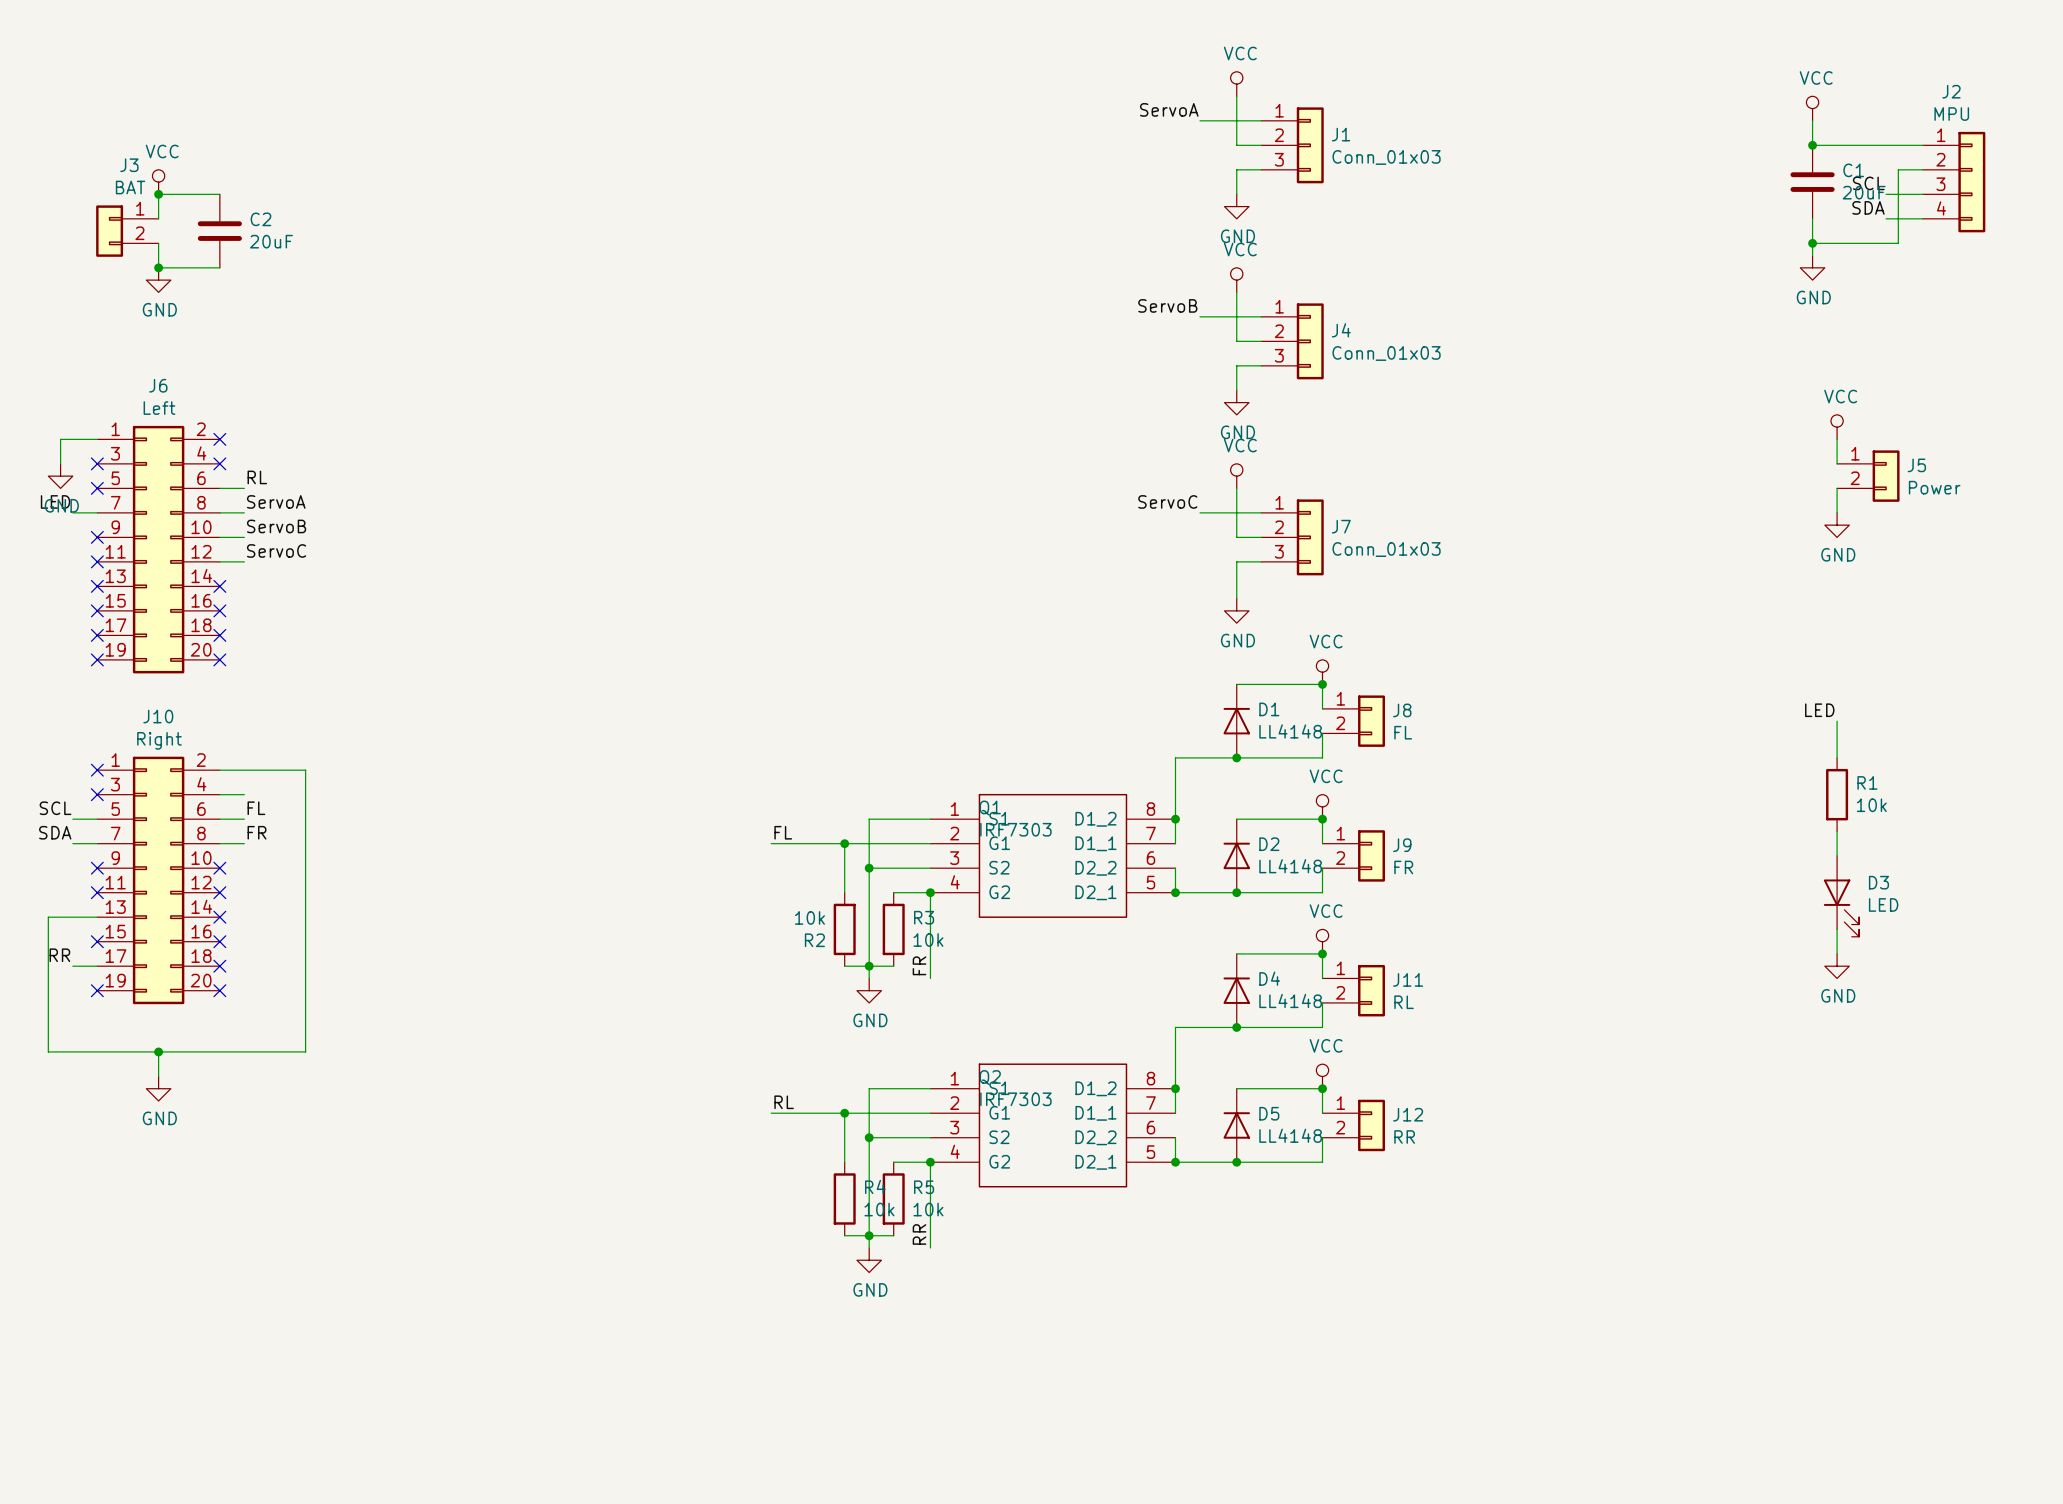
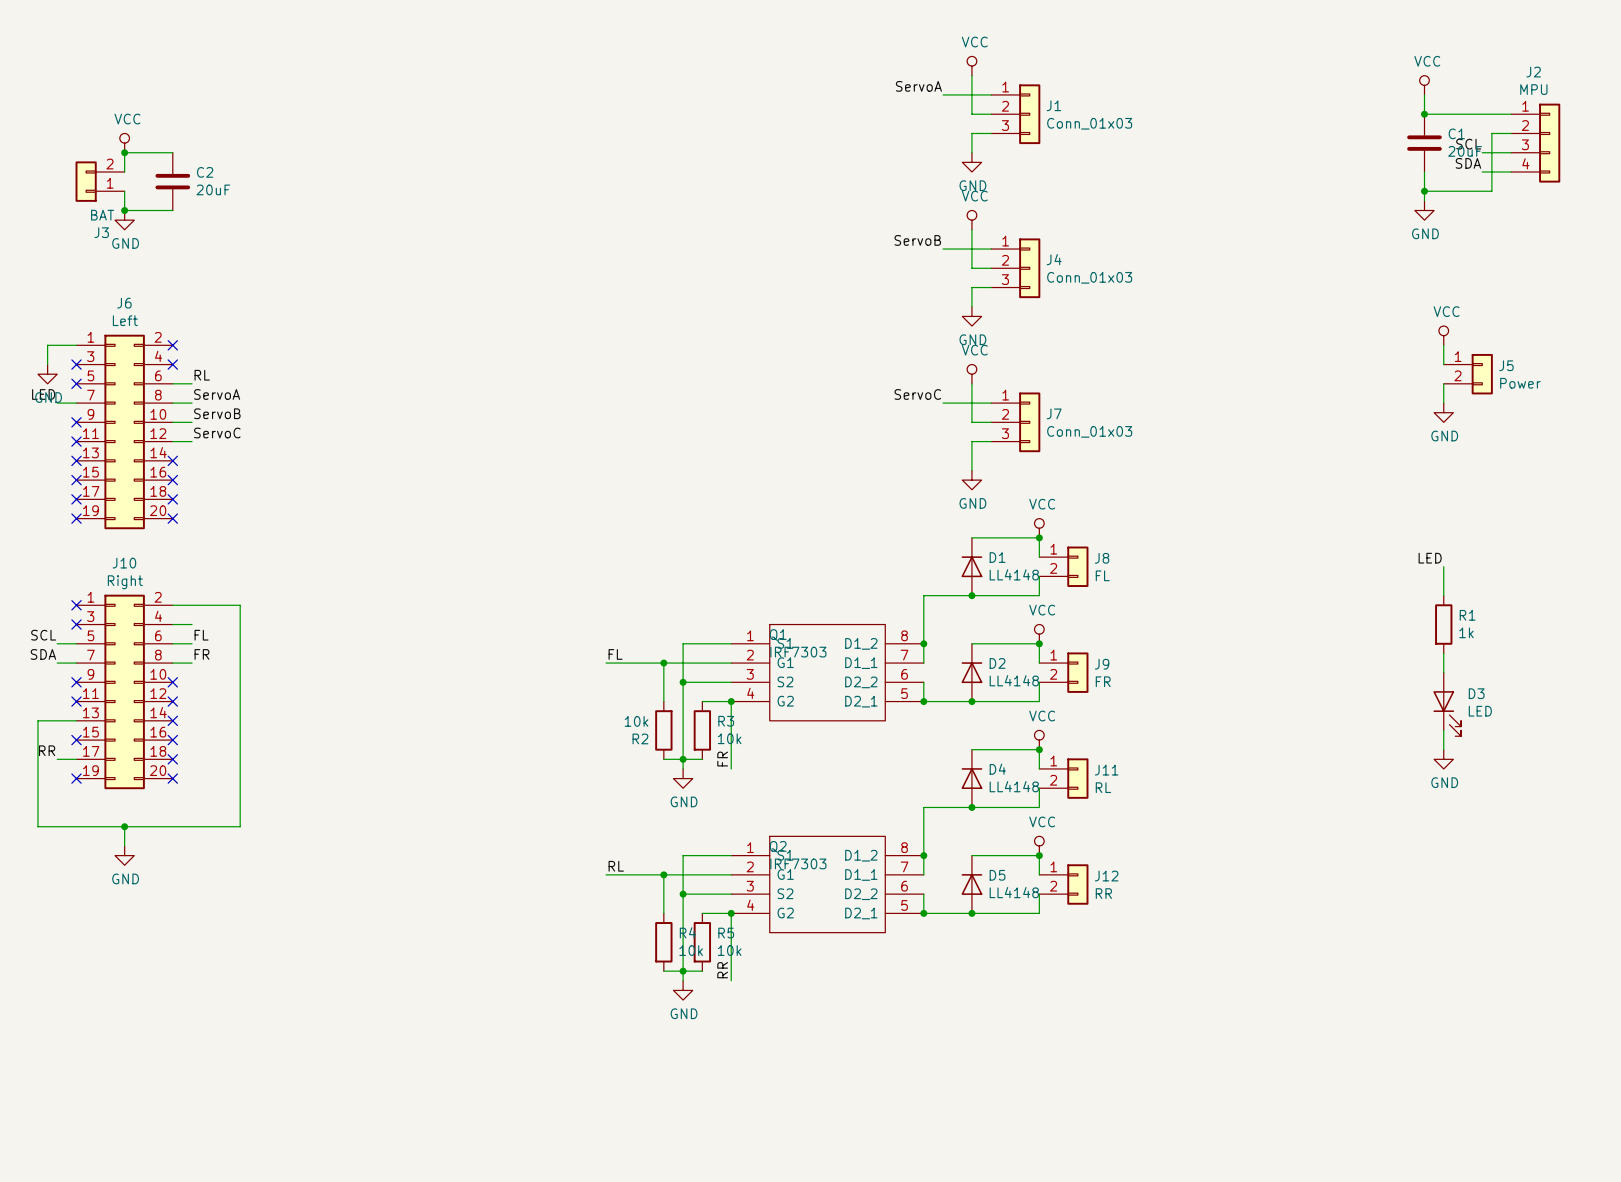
J3 flip: as is (109, 231) -> up-down (86, 181)
R1 value: 10k (1871, 805) -> 1k (1466, 632)

